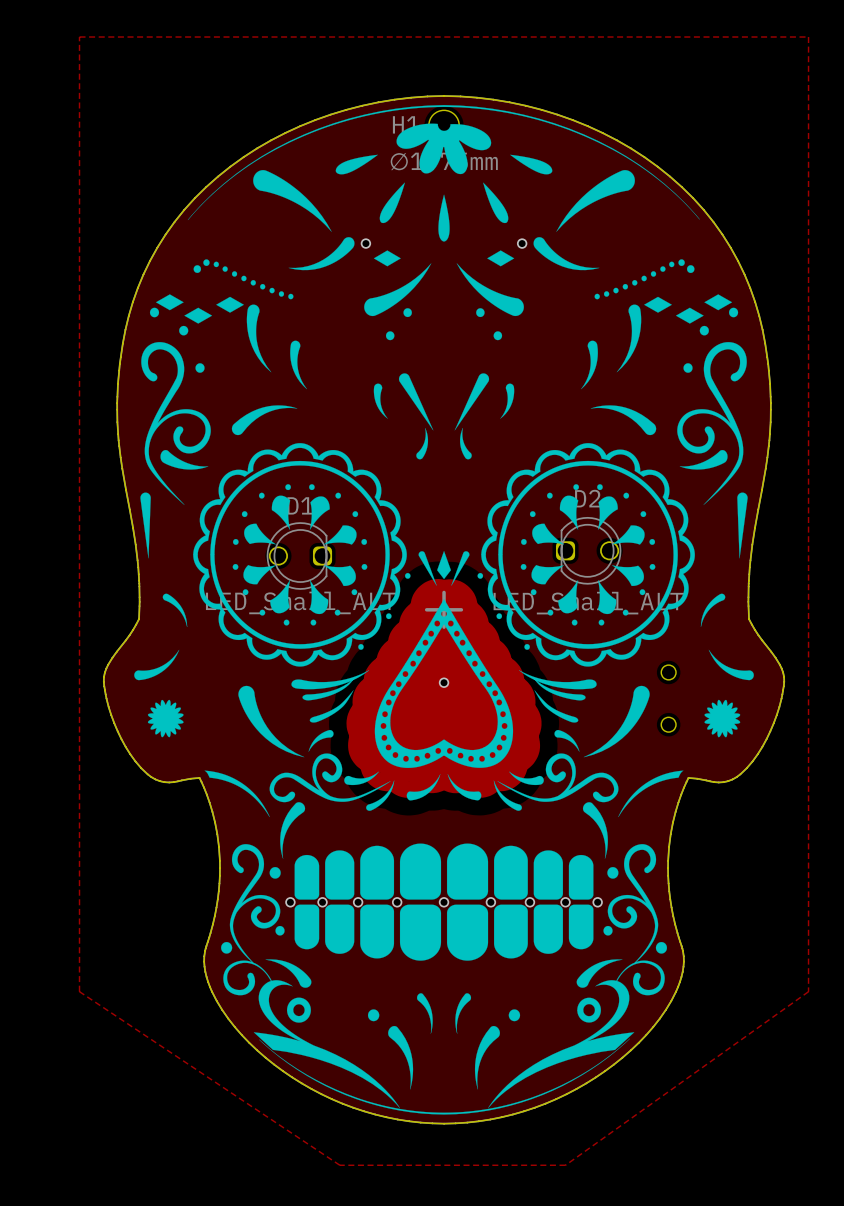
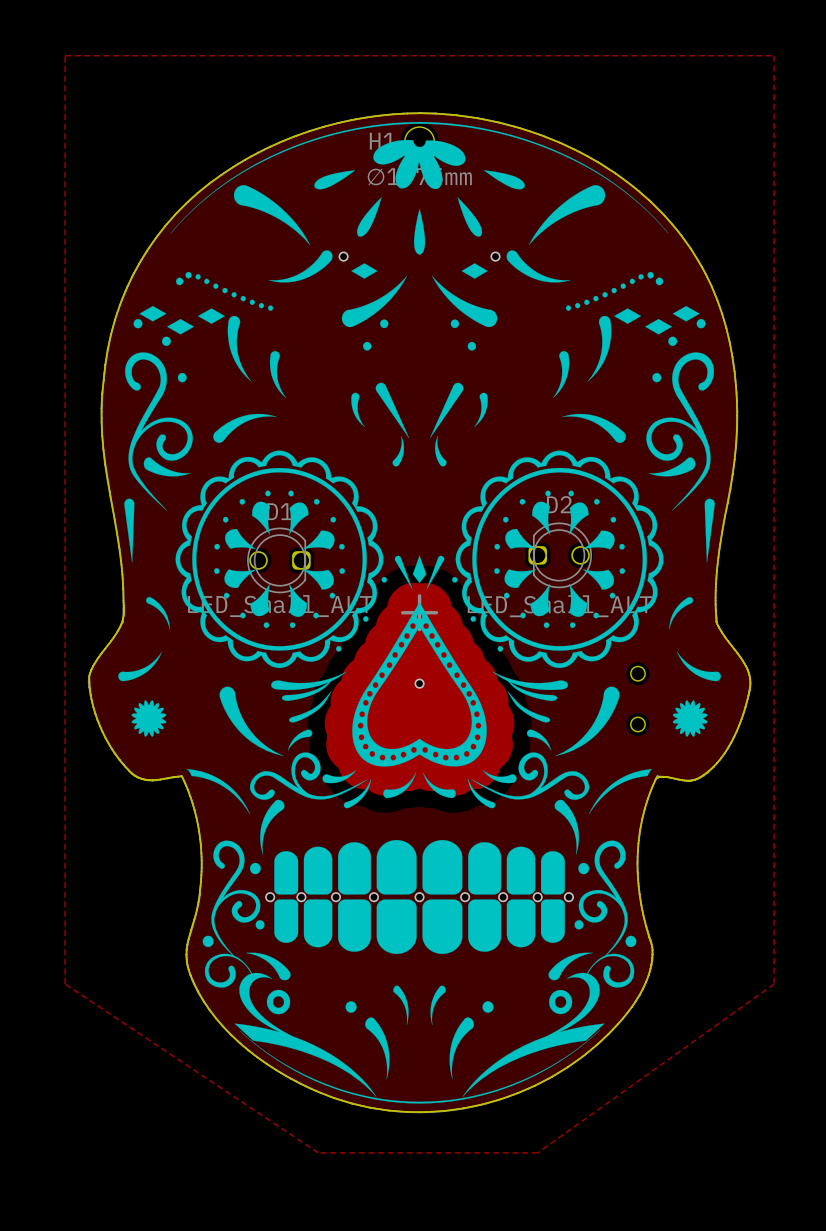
part footprint: [102, 95, 786, 1125] -> [87, 112, 752, 1114]

